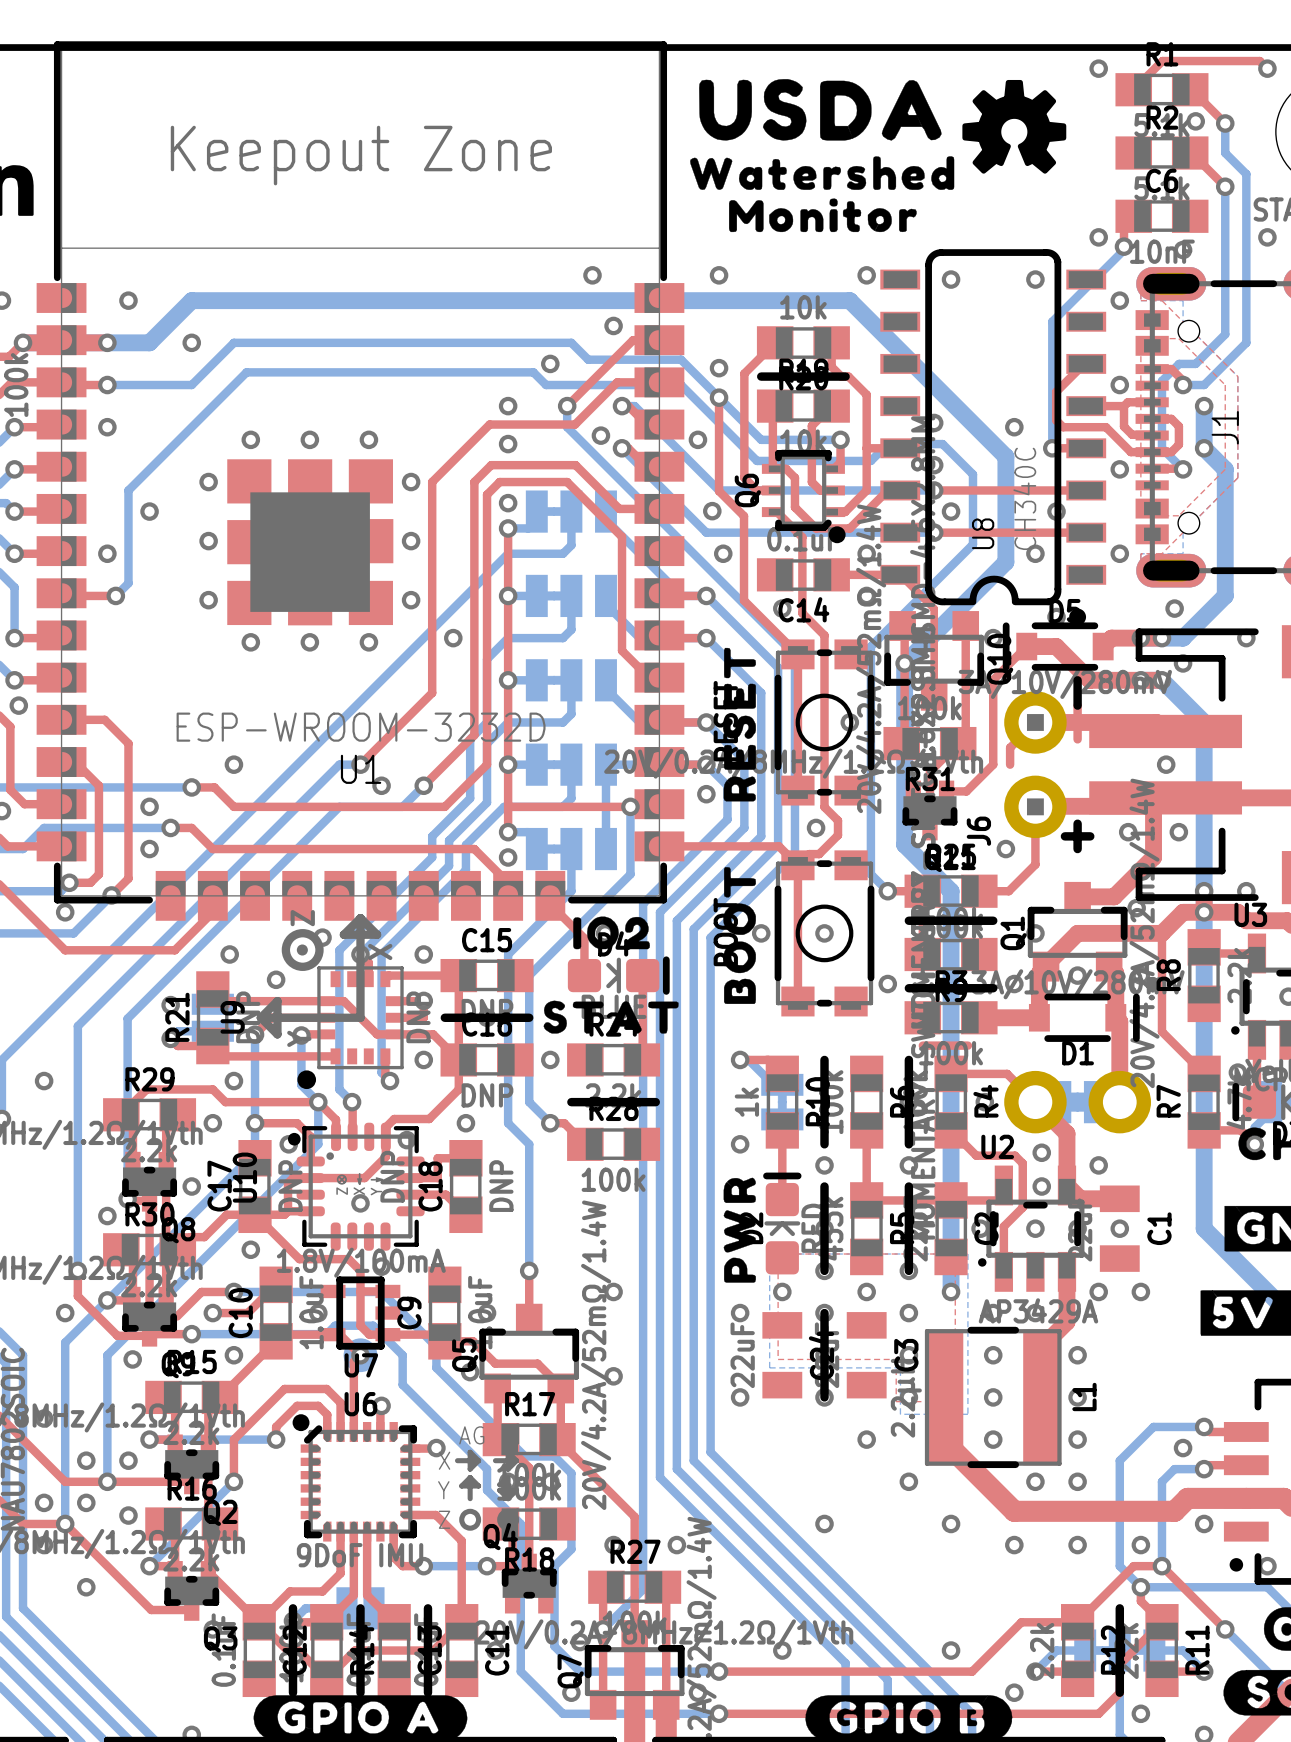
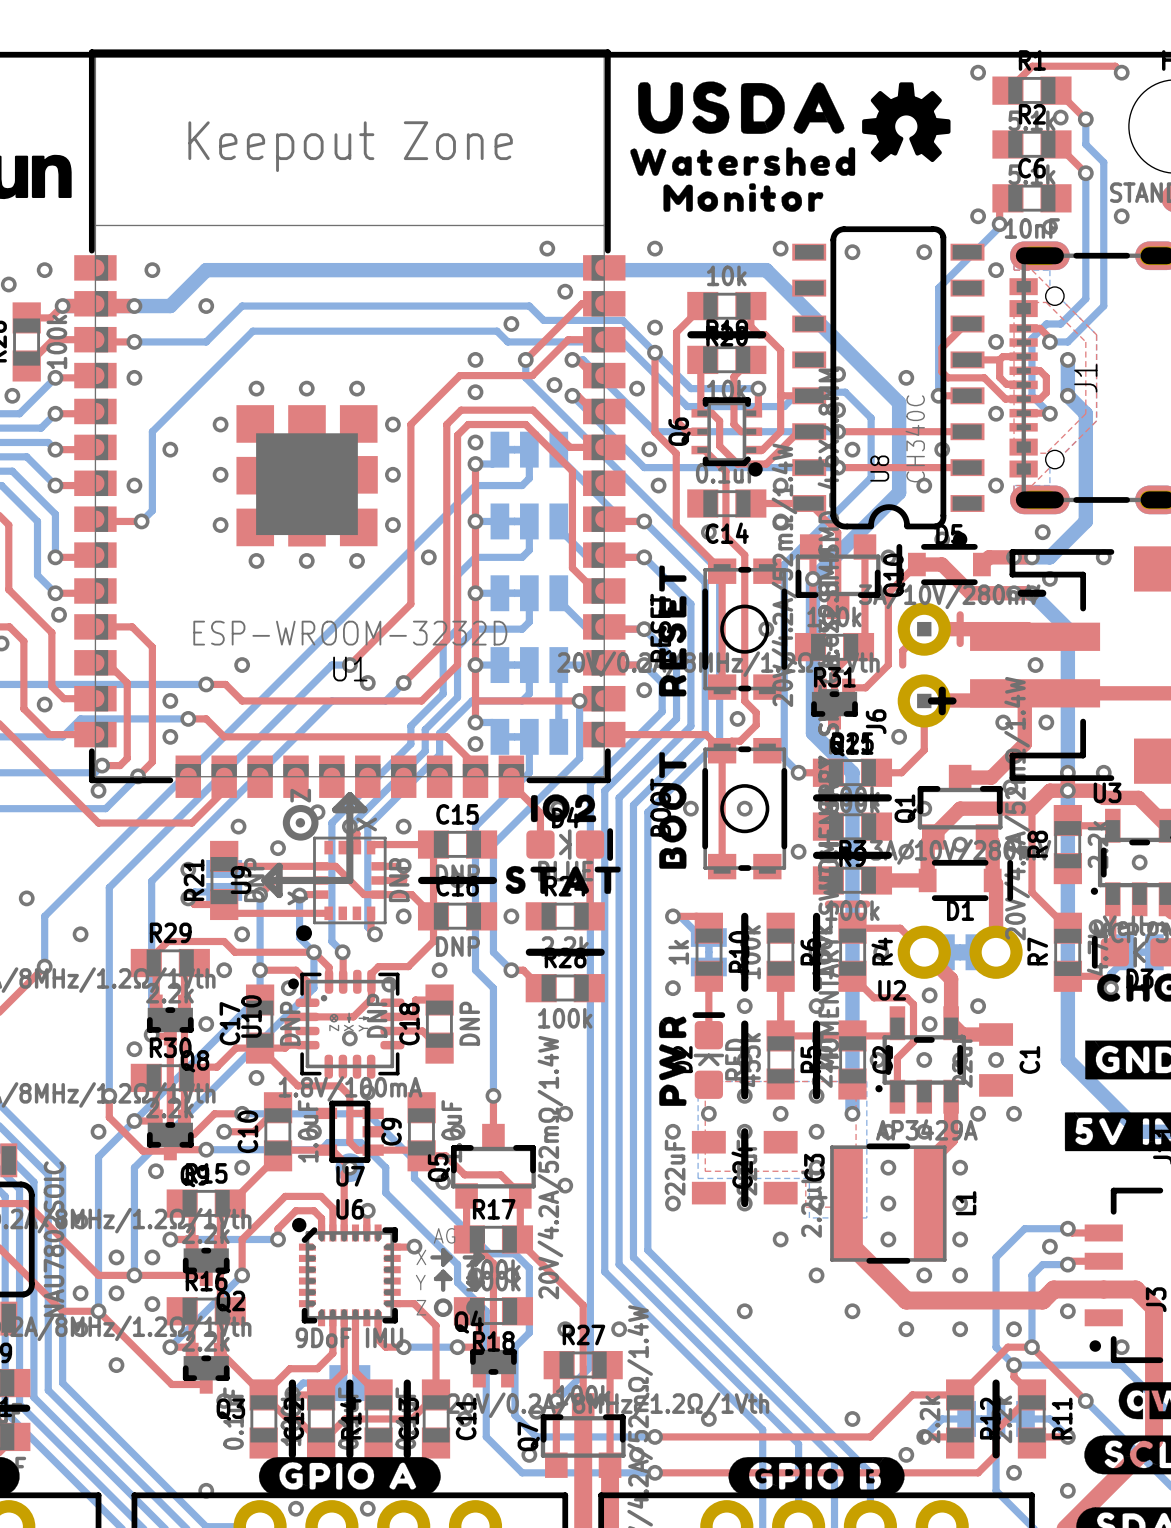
line: (1077, 680) (1077, 705) -> none
line: none -> (1021, 593) (1042, 593)
line: (1077, 823) (1077, 849) -> (942, 690) (942, 711)
line: (1064, 836) (1090, 836) -> (931, 700) (952, 700)

